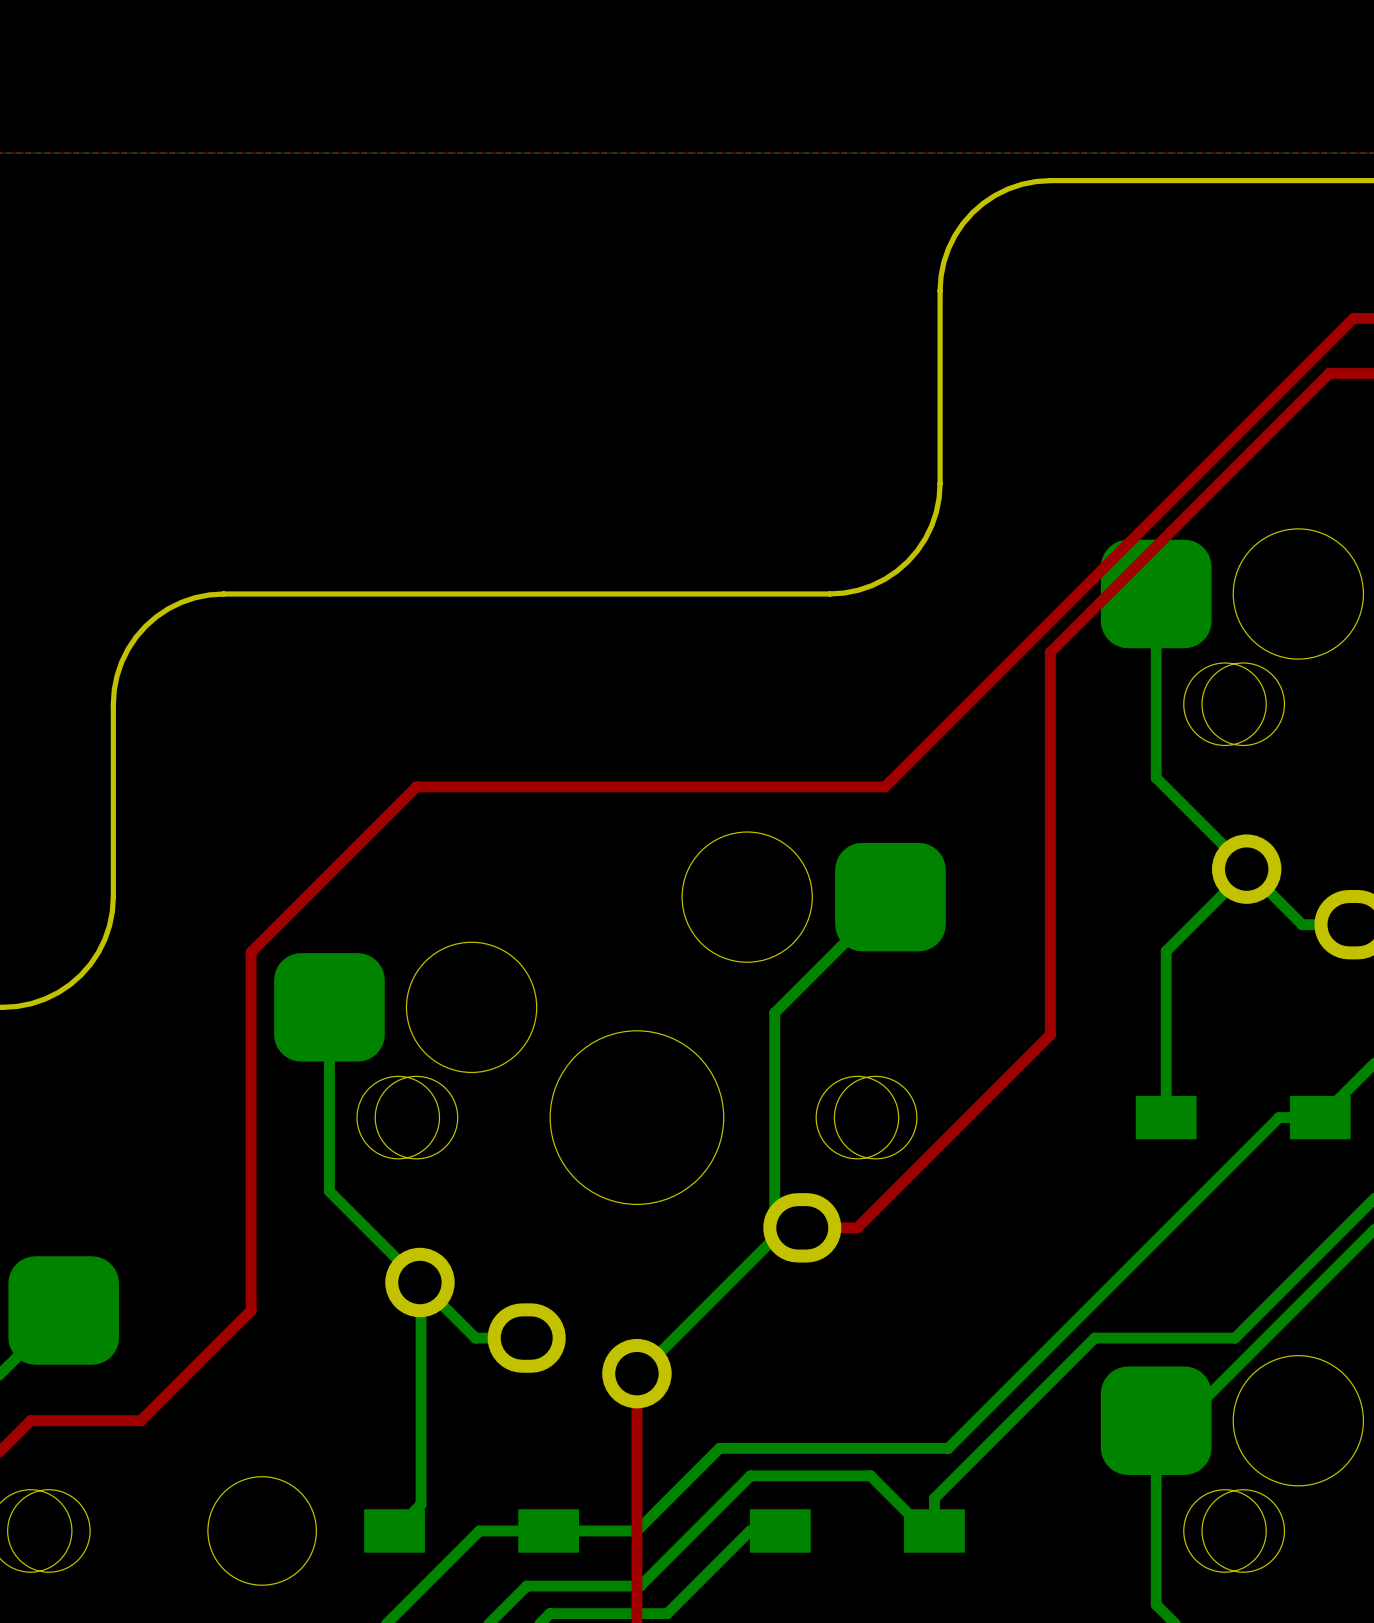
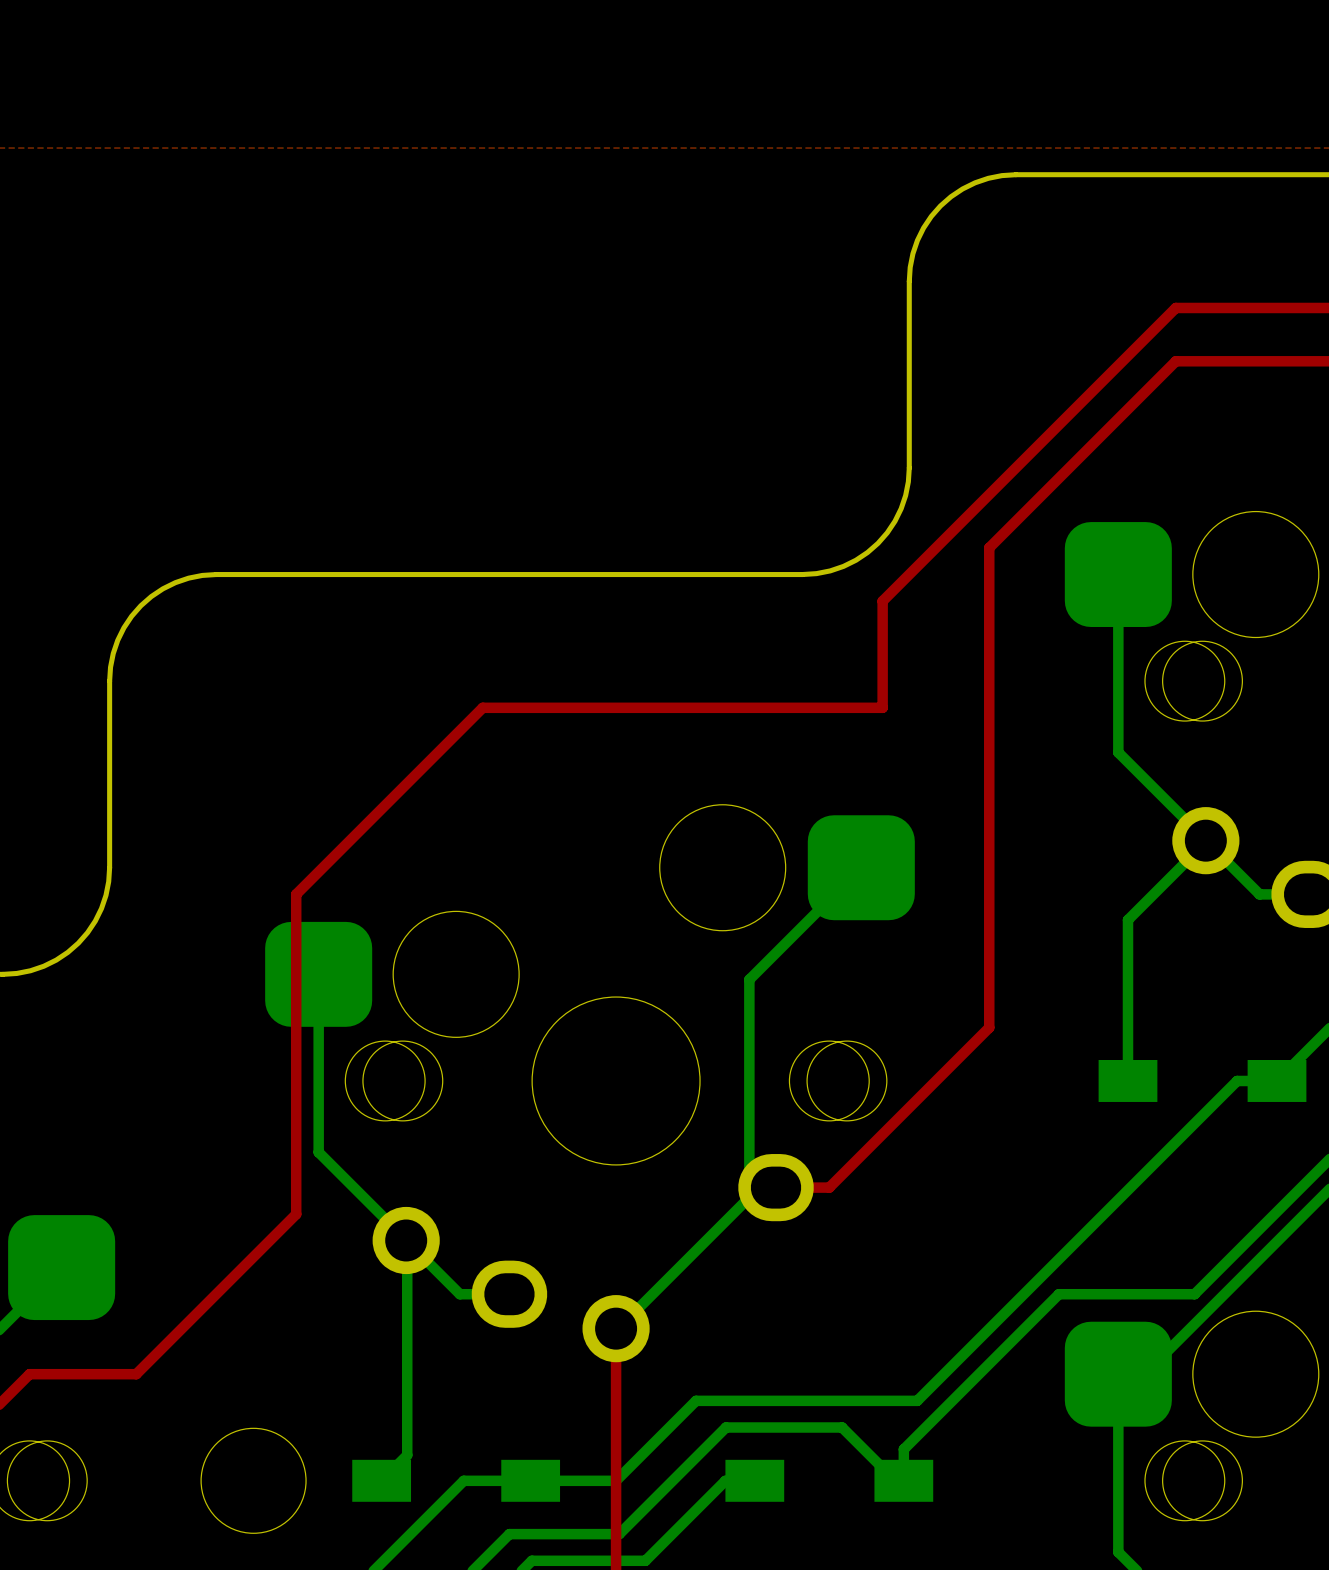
top track: (1353, 318) (884, 786) (416, 786) (251, 952) (251, 1310) -> (1309, 307) (1175, 307) (882, 601) (882, 707) (482, 707) (296, 894) (296, 1214) (242, 1267)
top track: (1329, 373) (1050, 652) (1050, 1034) (1022, 1062) -> (1285, 361) (1175, 361) (989, 547) (989, 1027)

